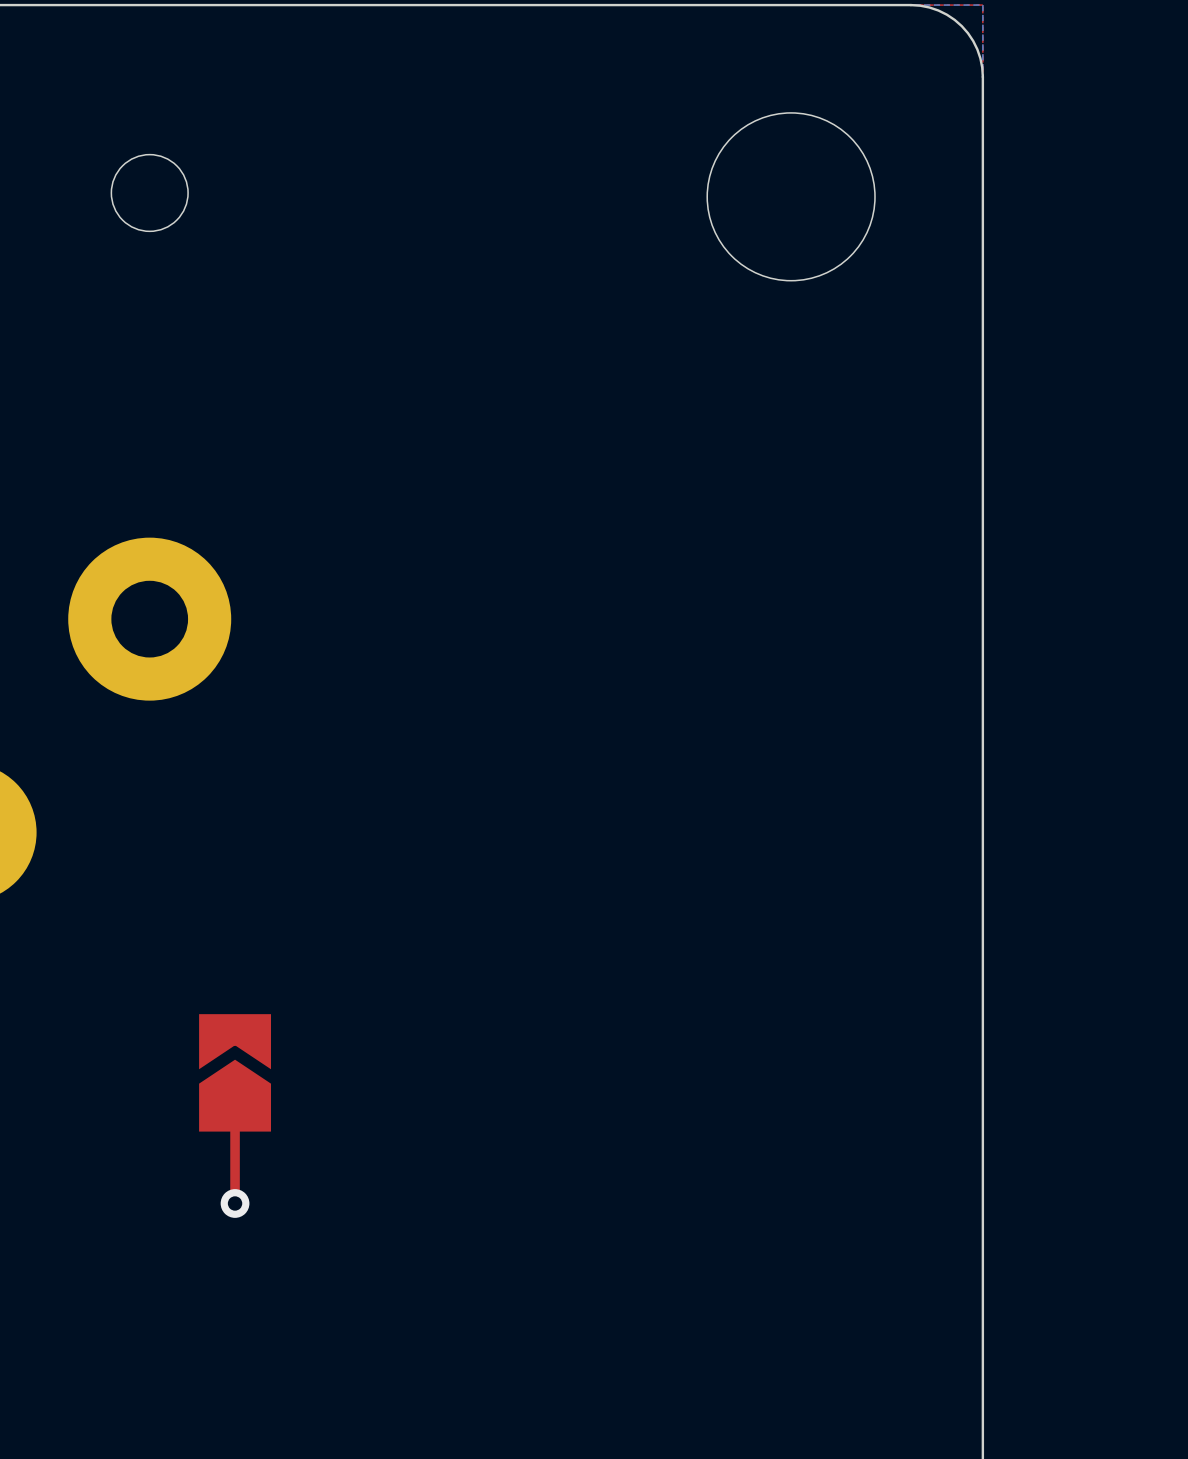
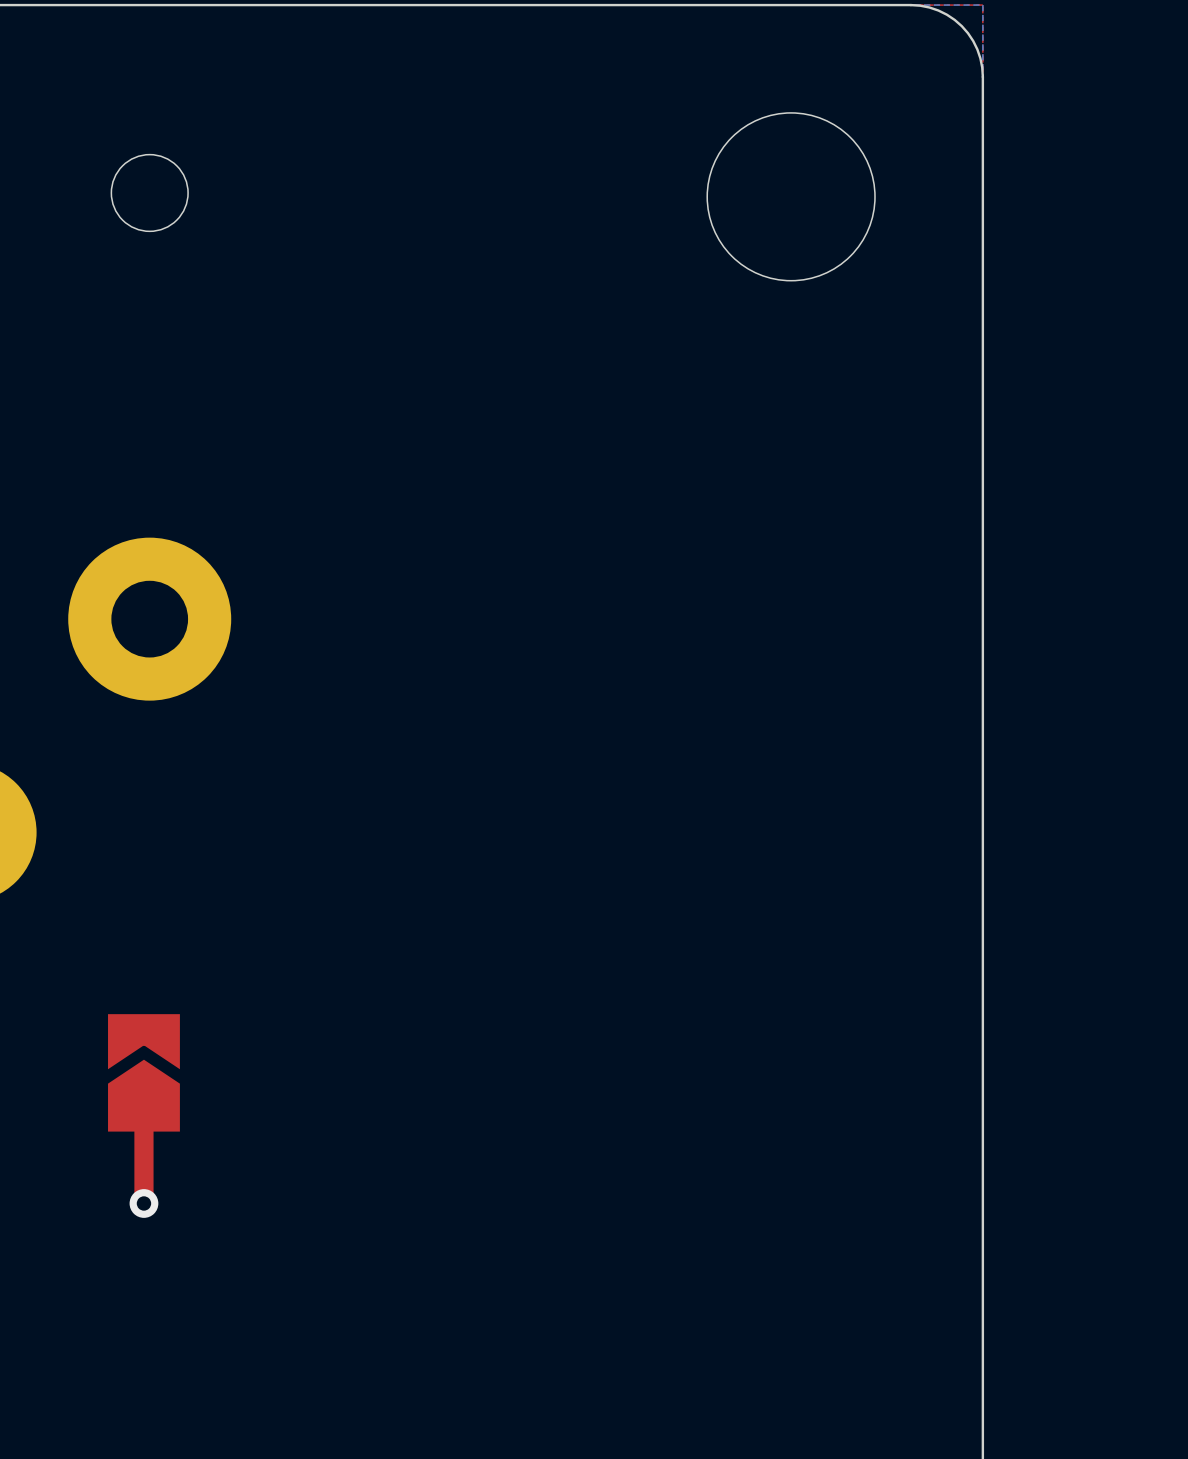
part position: (235, 1072) -> (143, 1072)
top track: (235, 1107) (235, 1203) -> (143, 1107) (143, 1203)
via position: (235, 1203) -> (143, 1203)

